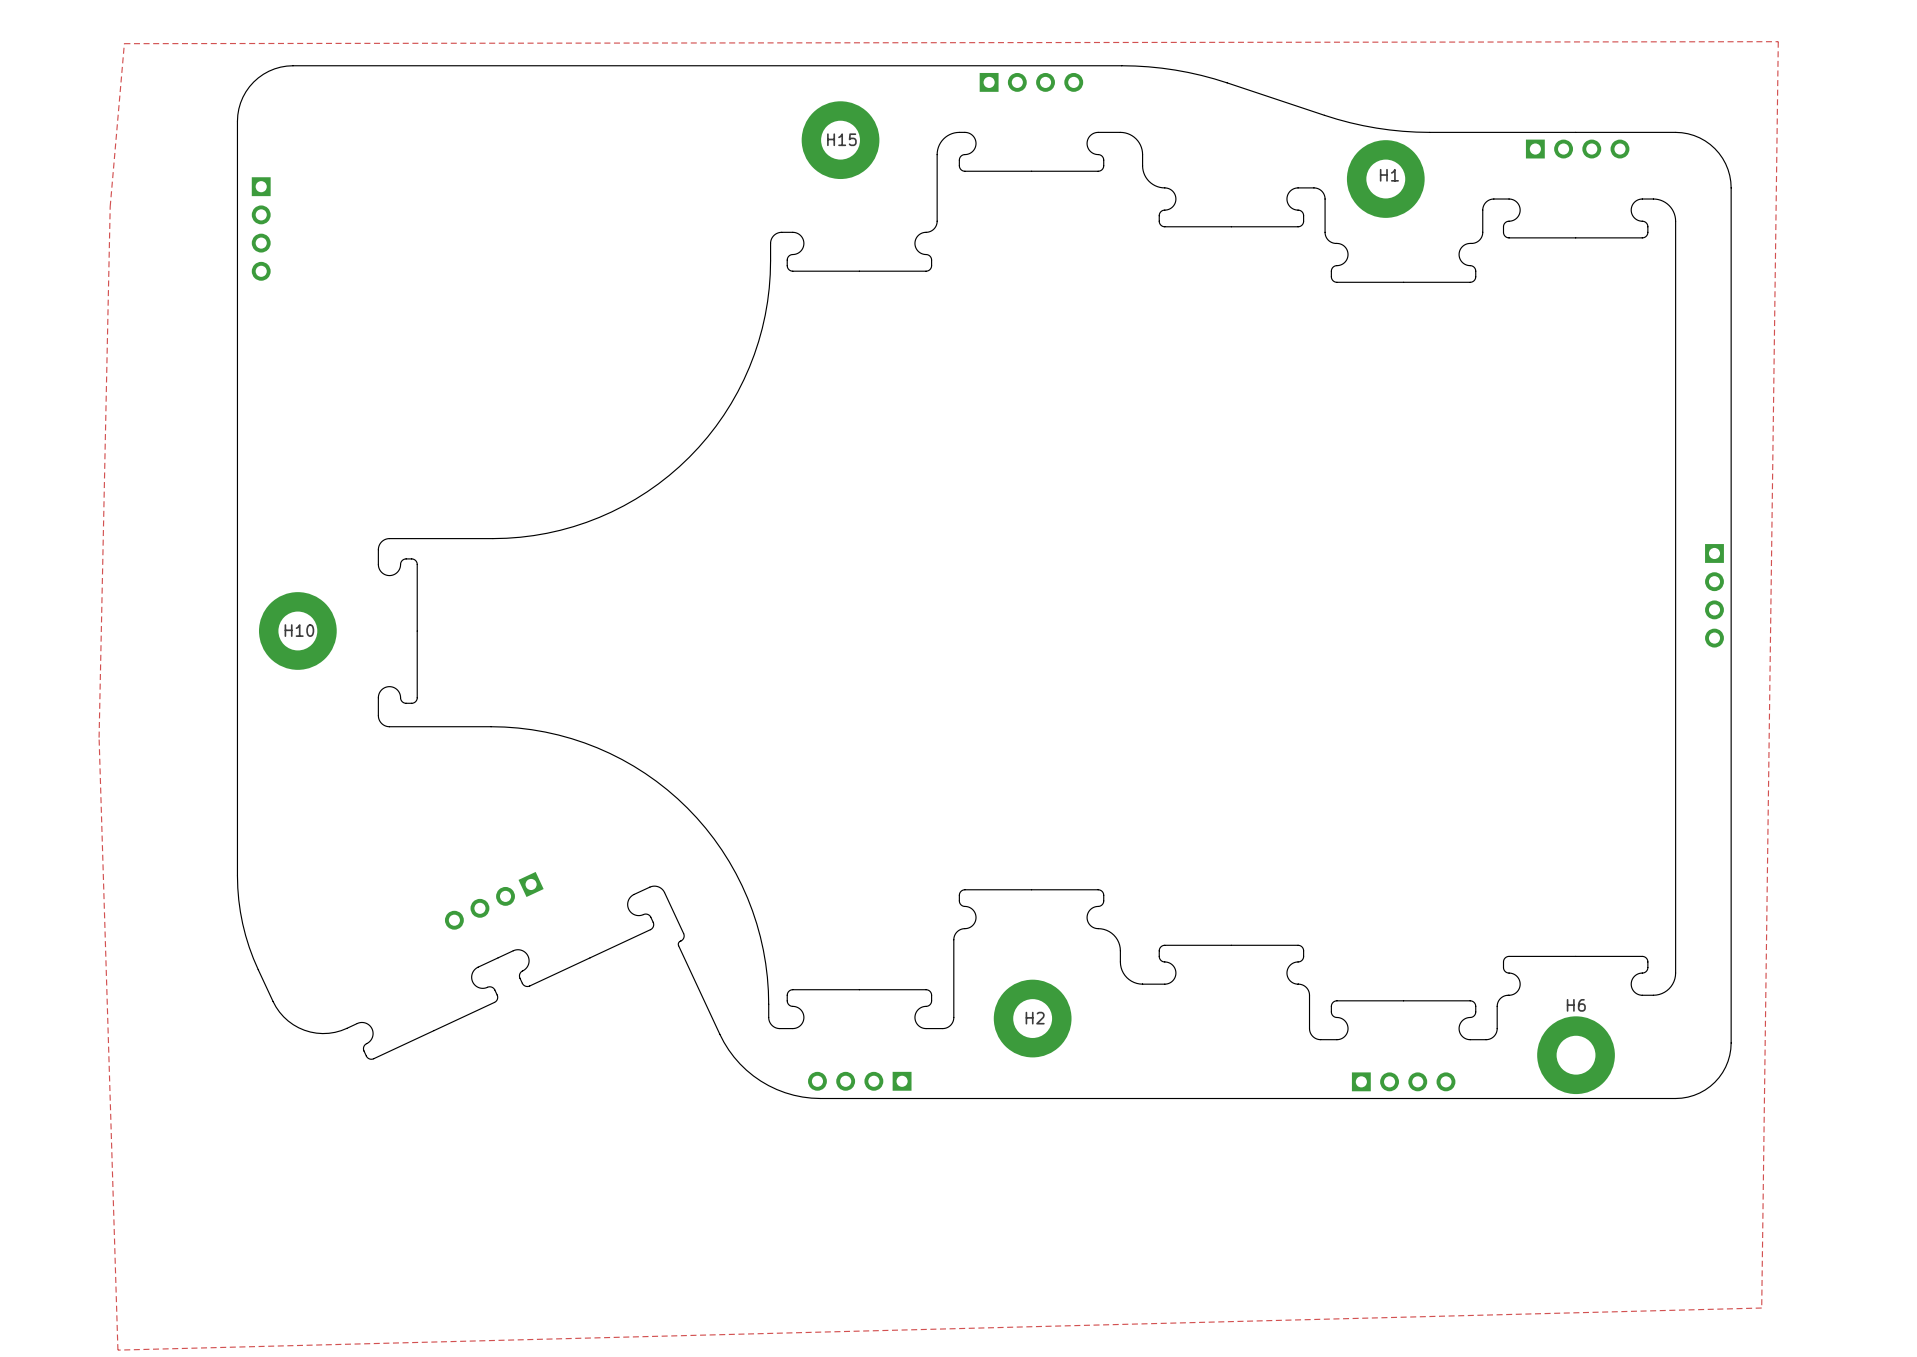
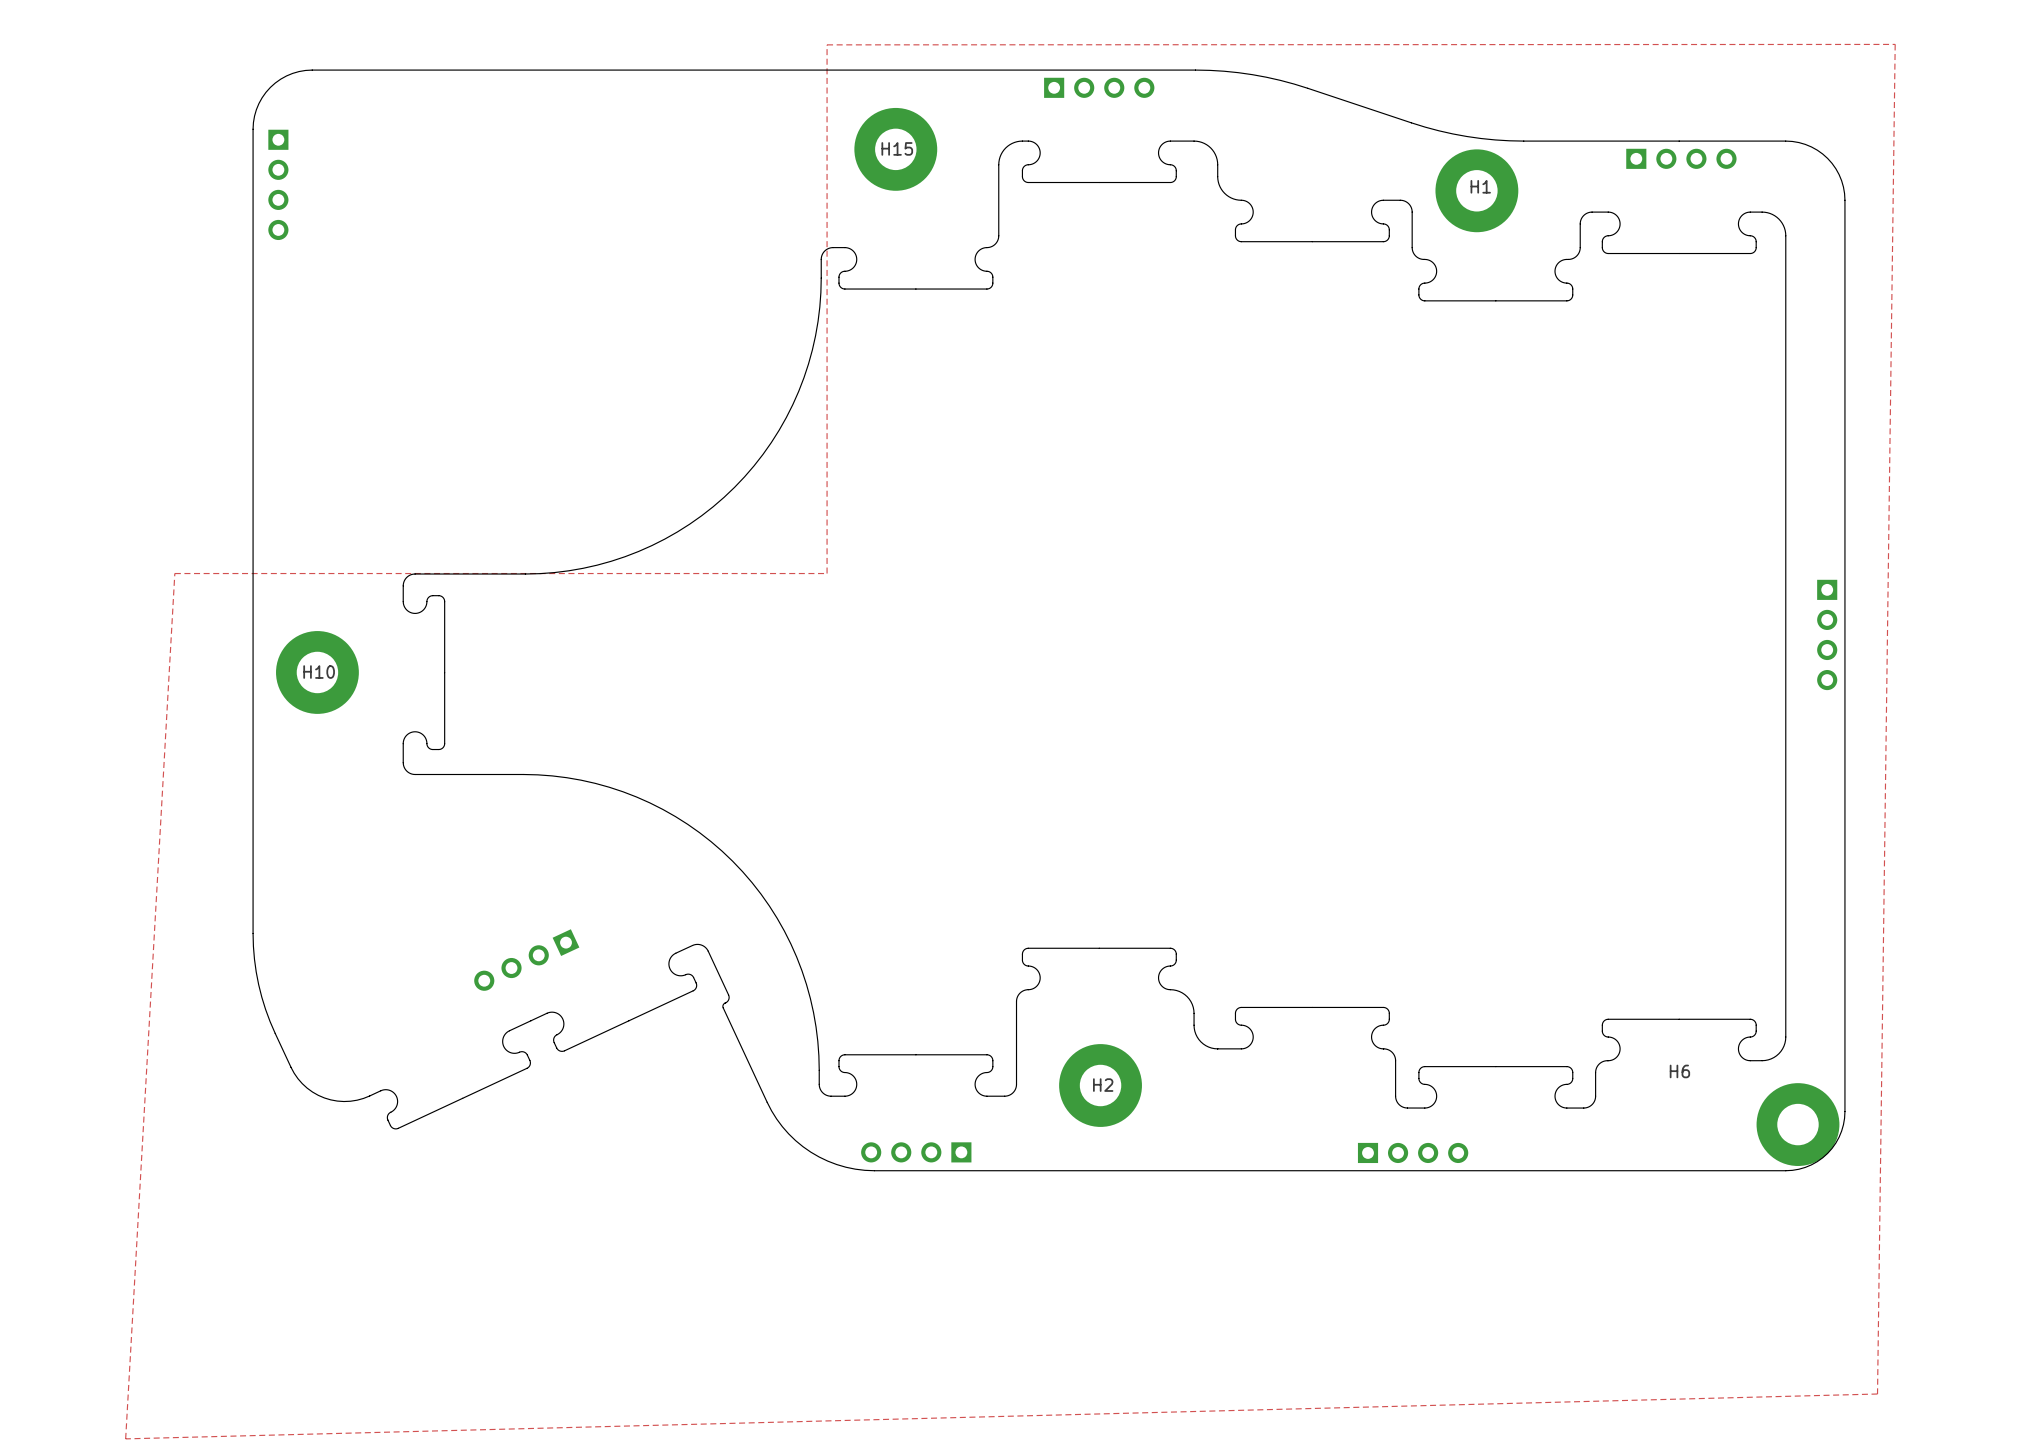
zone outline: (1778, 41) (124, 43) (110, 206) (99, 737) (117, 1350) -> (1895, 44) (827, 44) (827, 573) (174, 573) (125, 1438)
part position: (261, 228) -> (278, 184)
H6 position: (1576, 1055) -> (1797, 1124)
part position: (1403, 1081) -> (1413, 1152)

